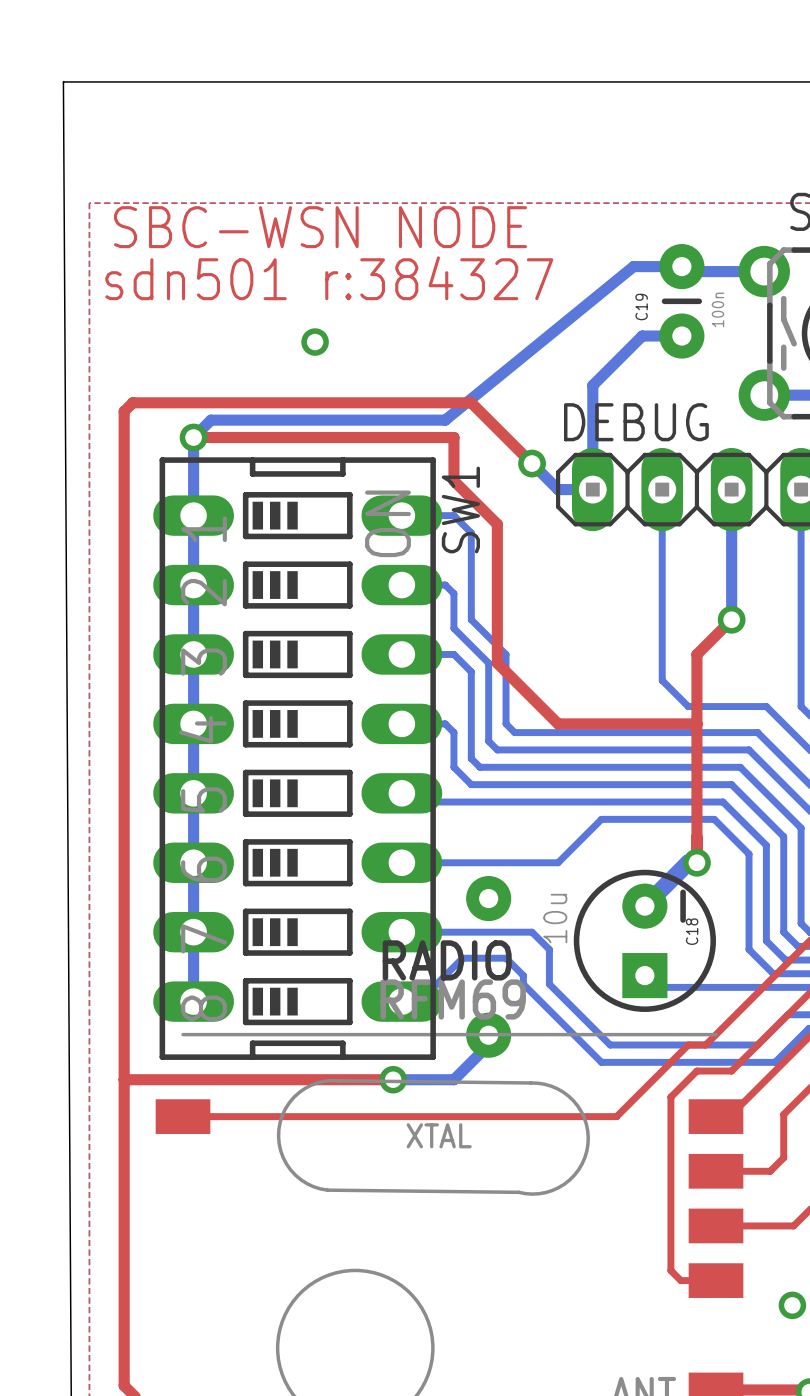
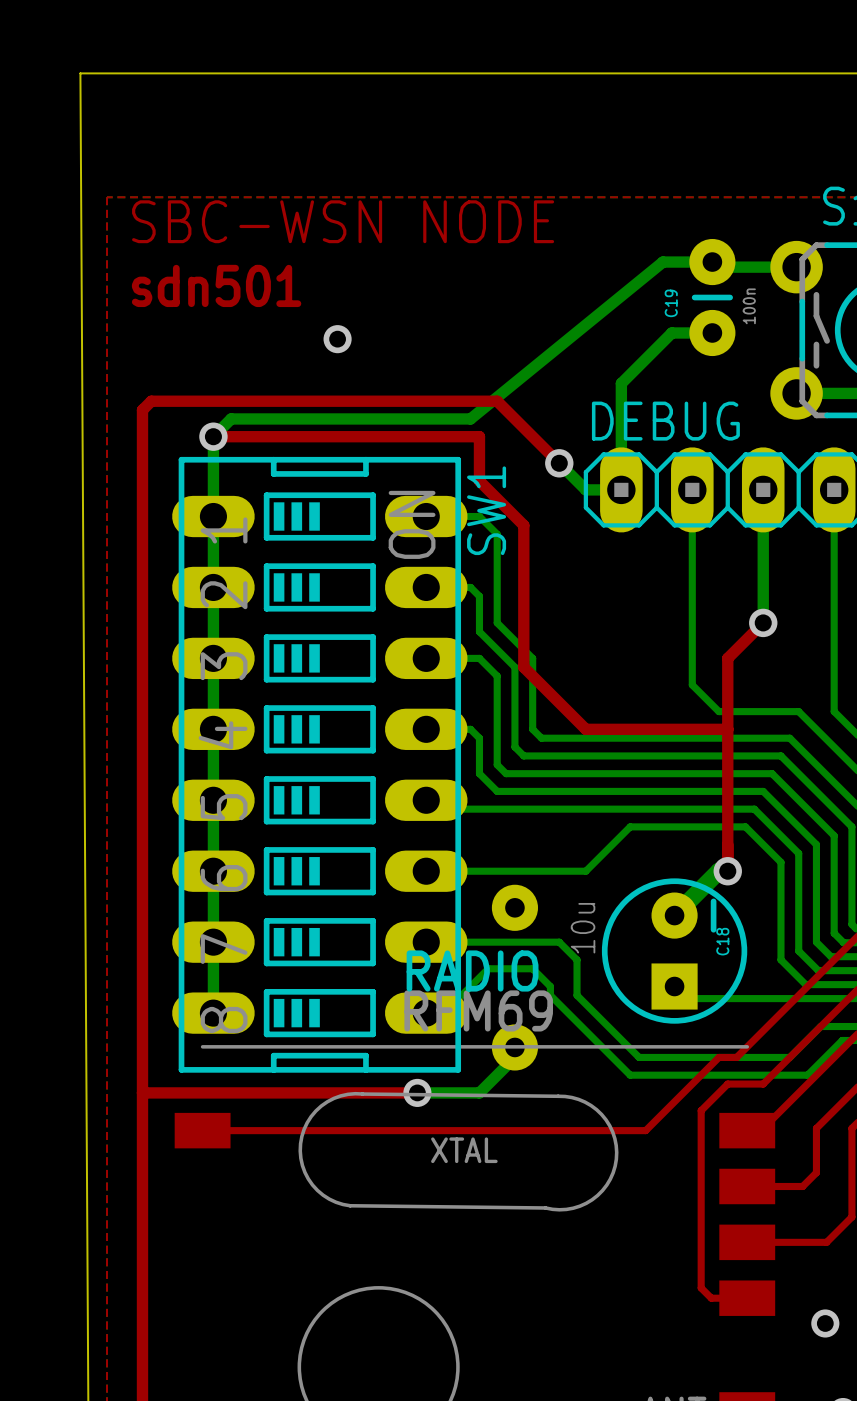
text: sdn501 r:384327 (329, 278) -> sdn501 (216, 285)

